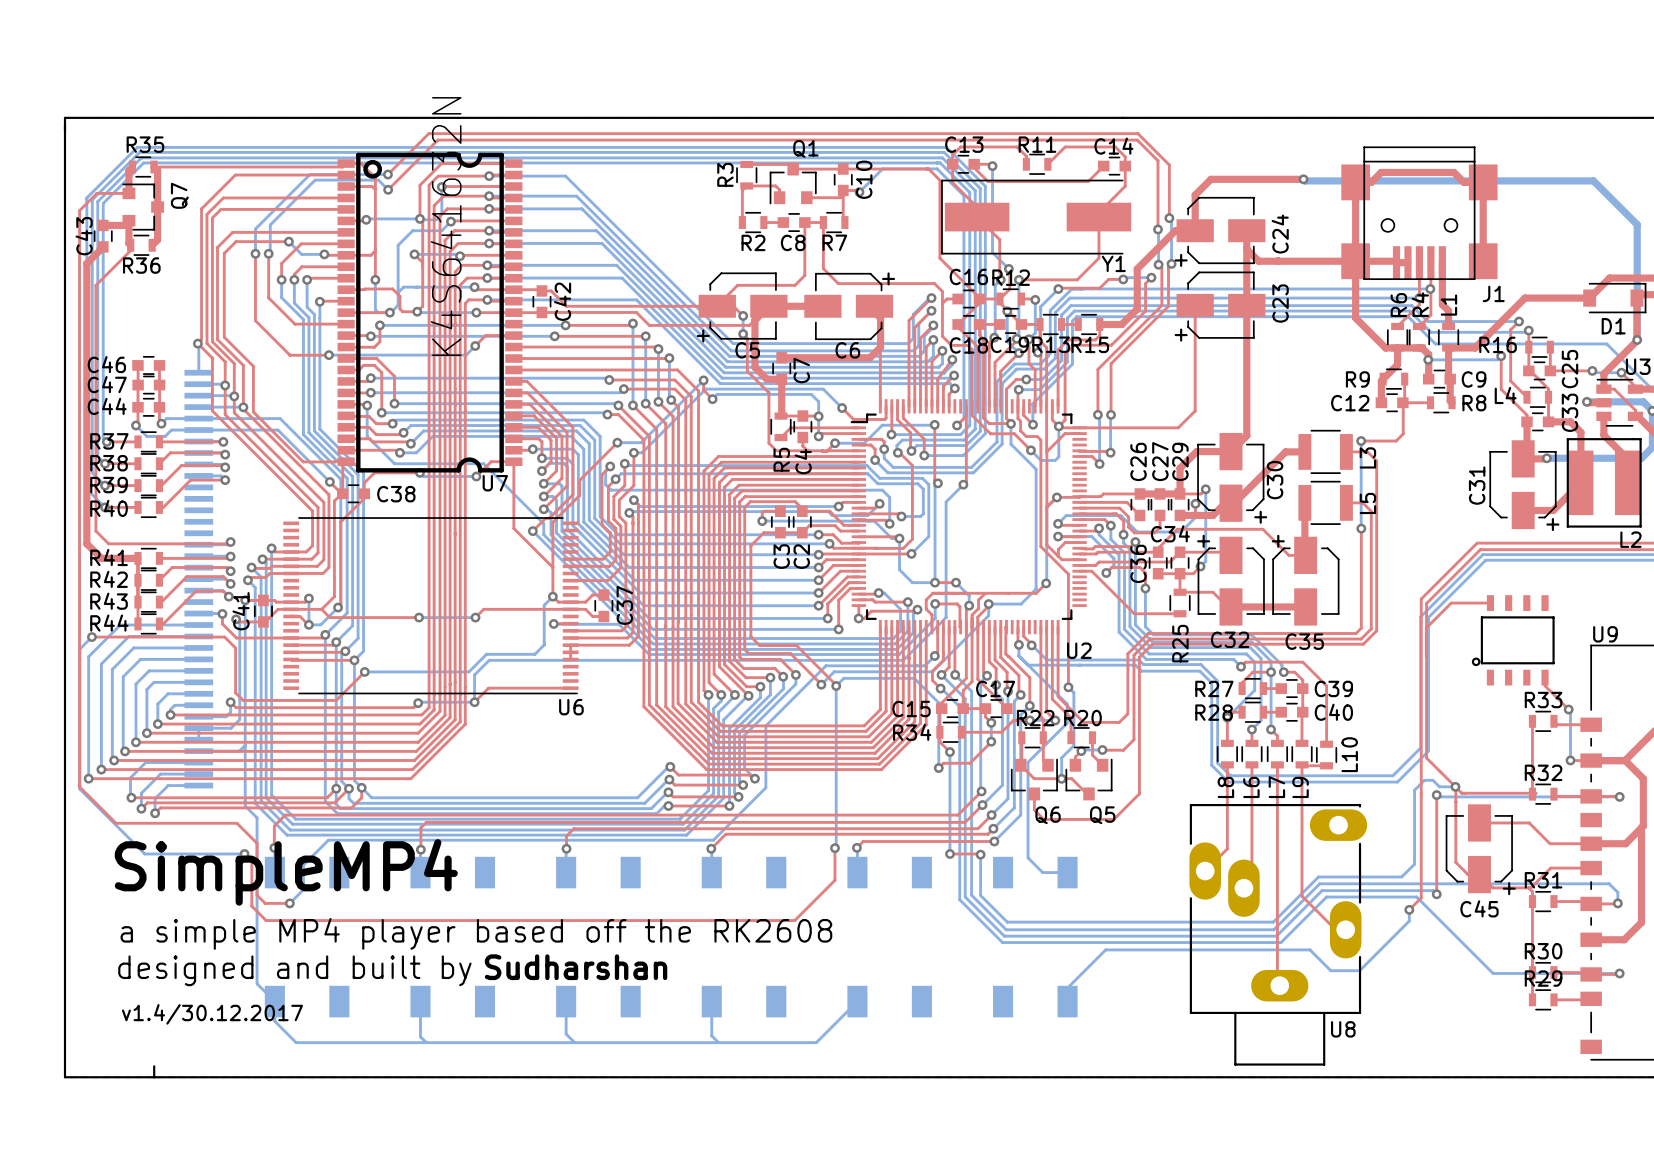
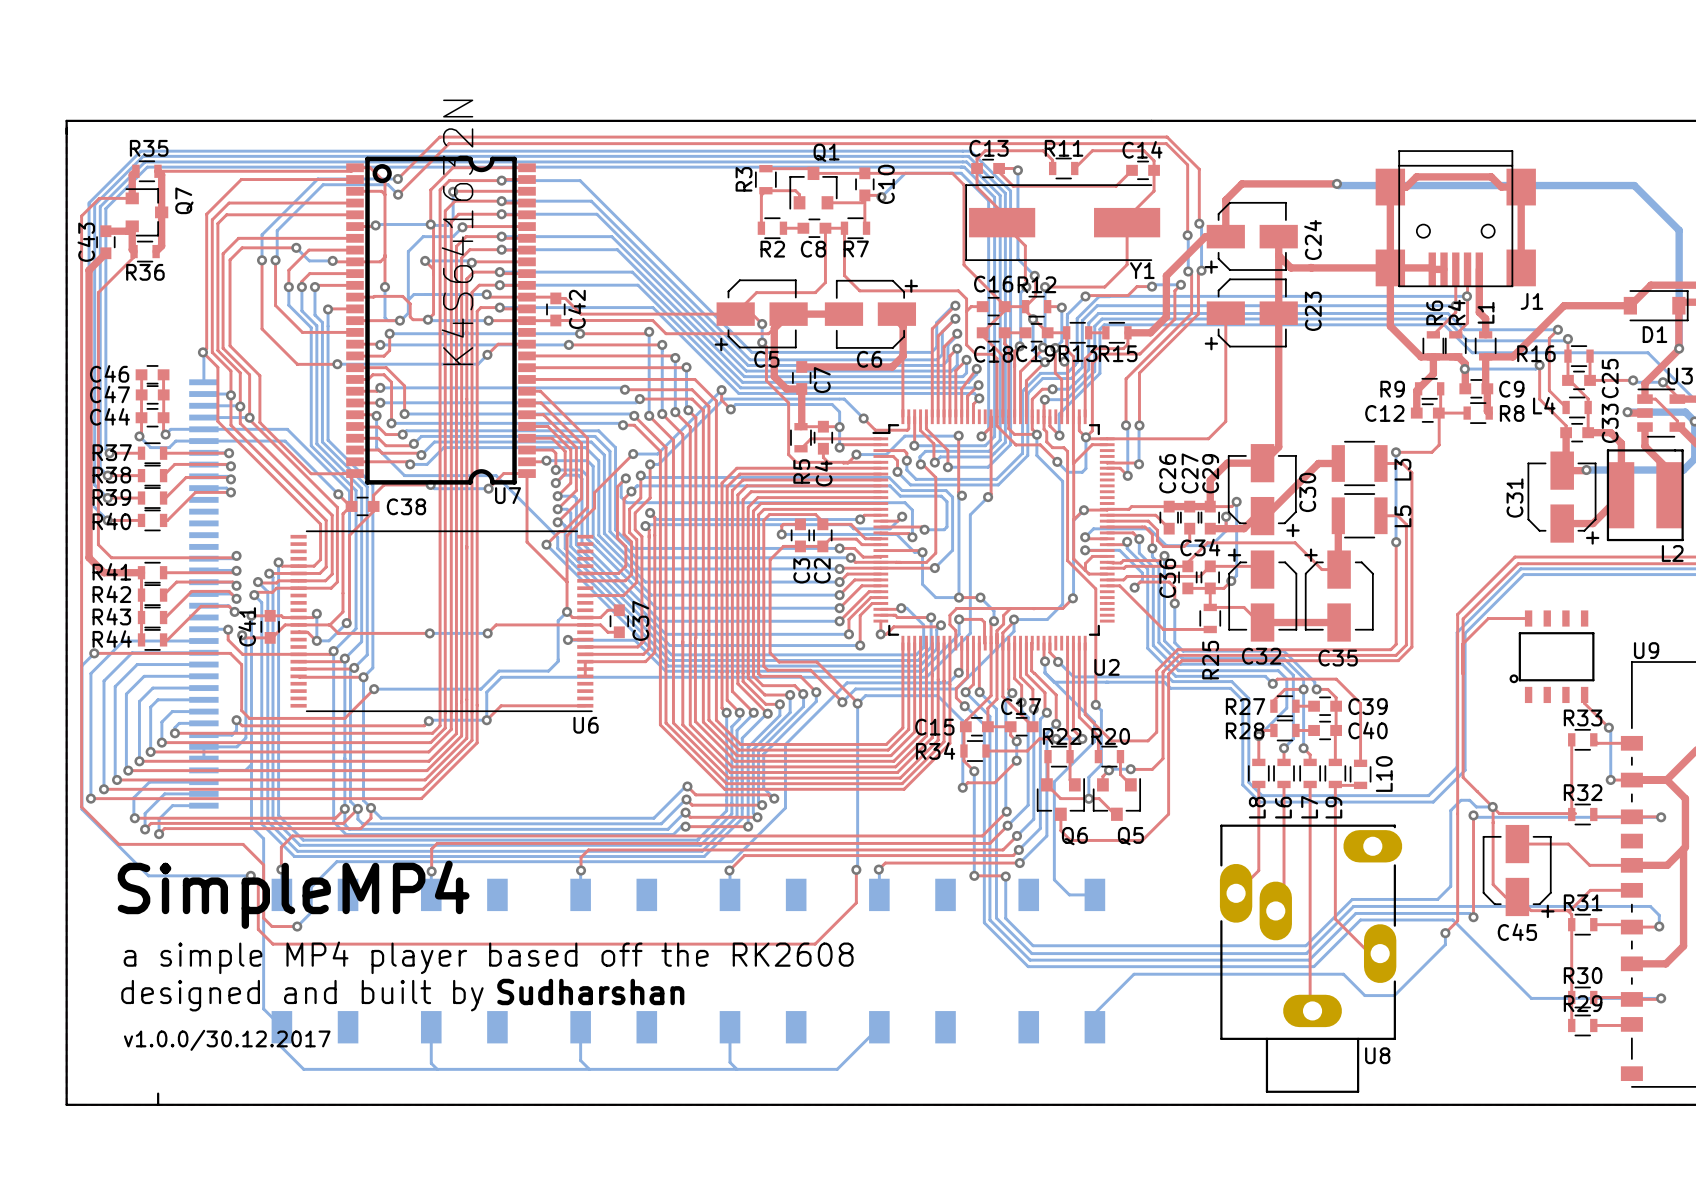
text: v1.4/30.12.2017 (212, 1014) -> v1.0.0/30.12.2017 (227, 1040)

